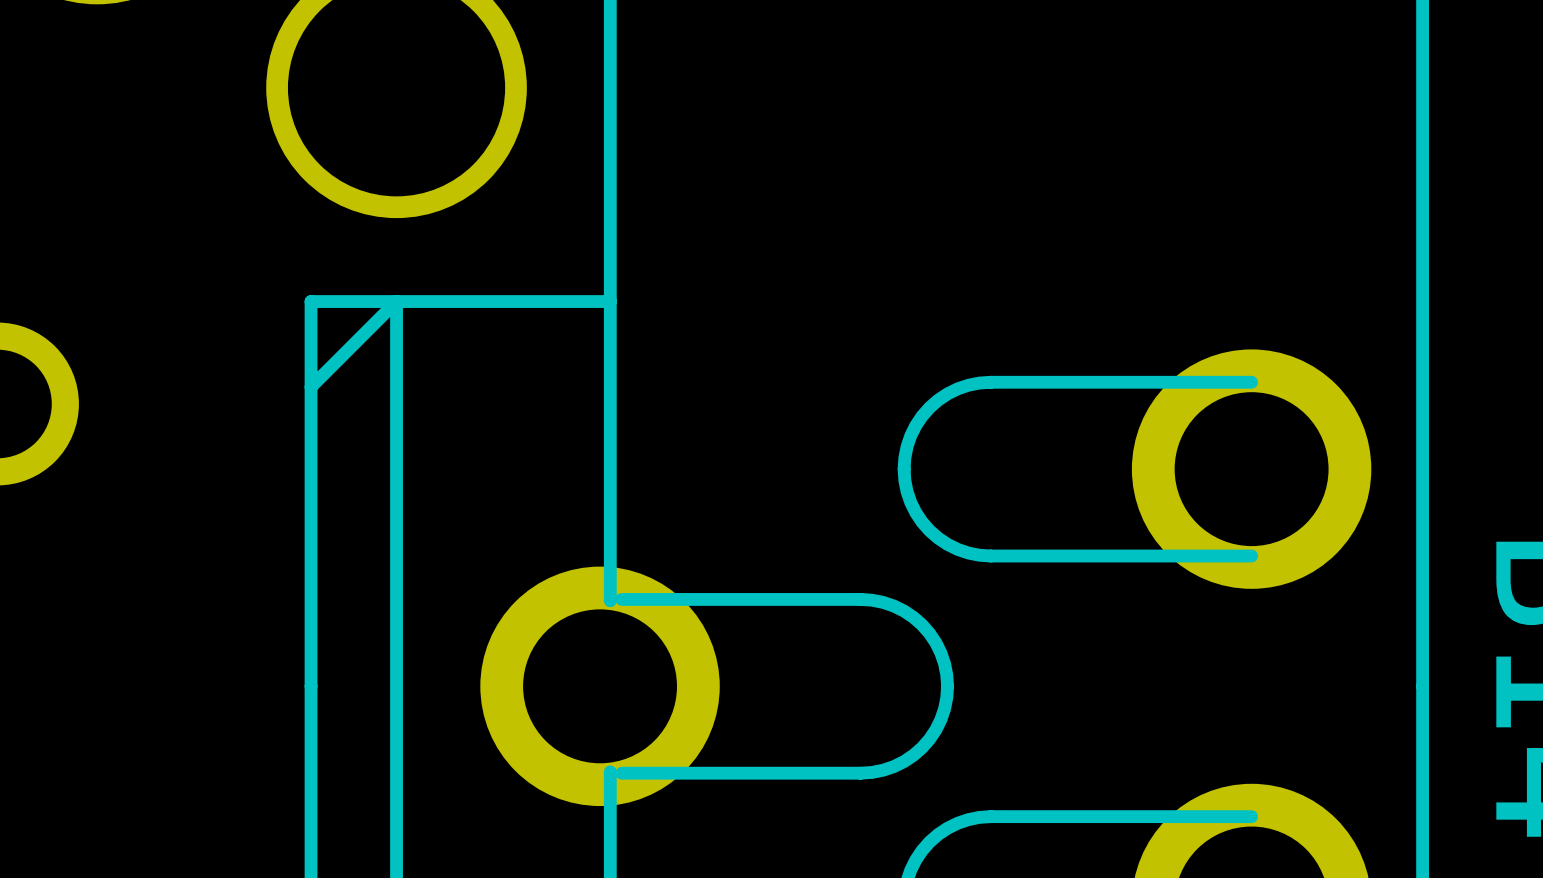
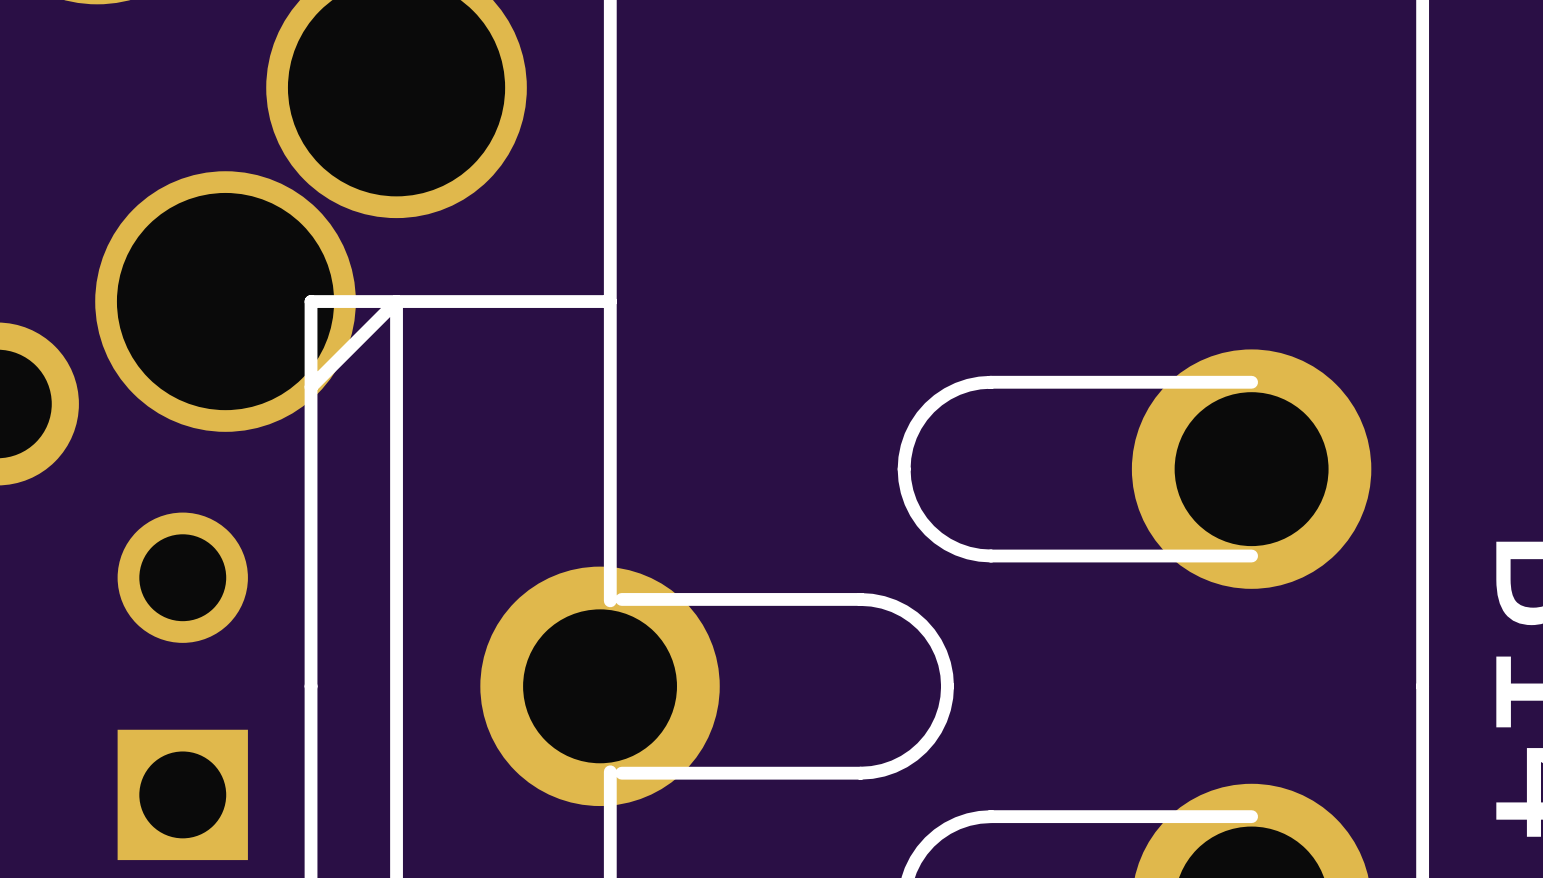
part: none -> (225, 301)
part: none -> (182, 686)

